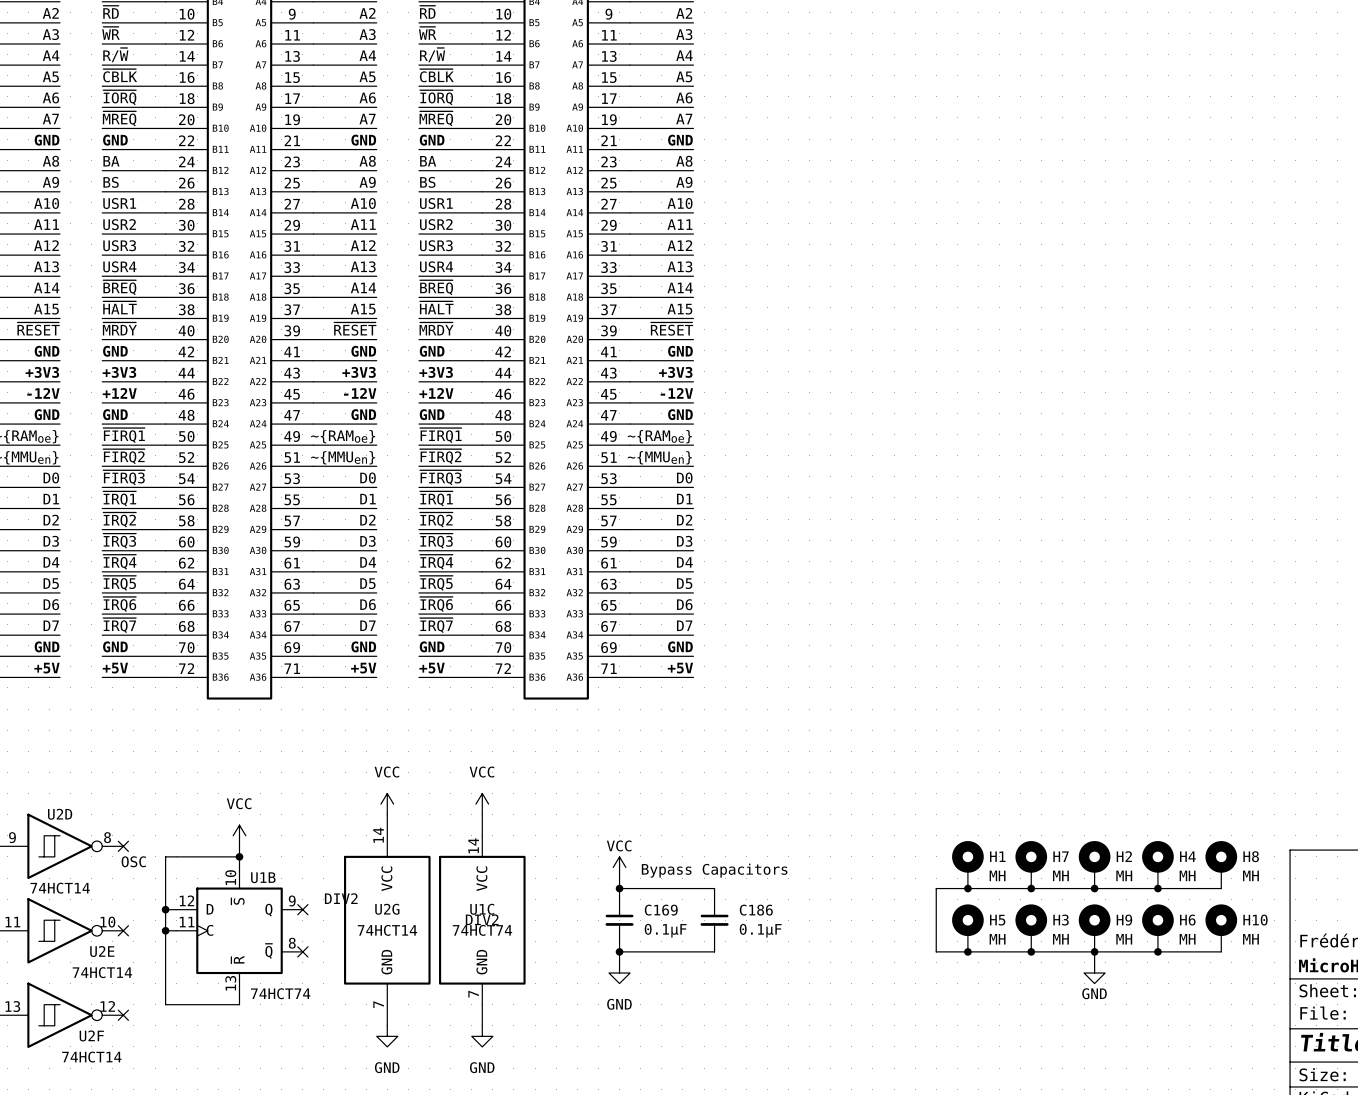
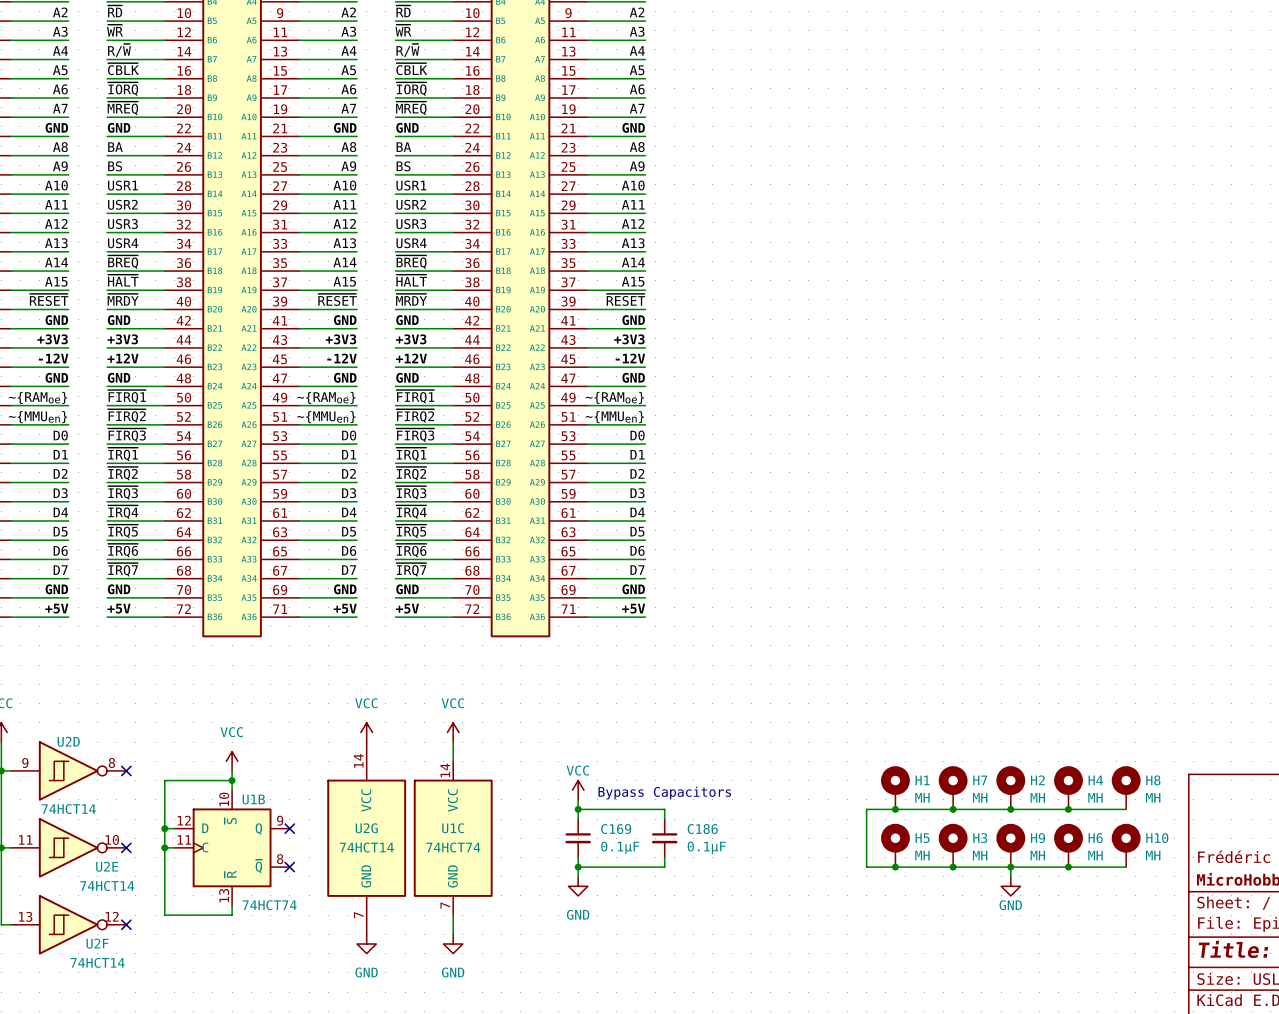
U2D text: OSC (133, 861) -> none
U1B text: DIV2 (341, 898) -> none
U1C text: DIV2 (482, 919) -> none

